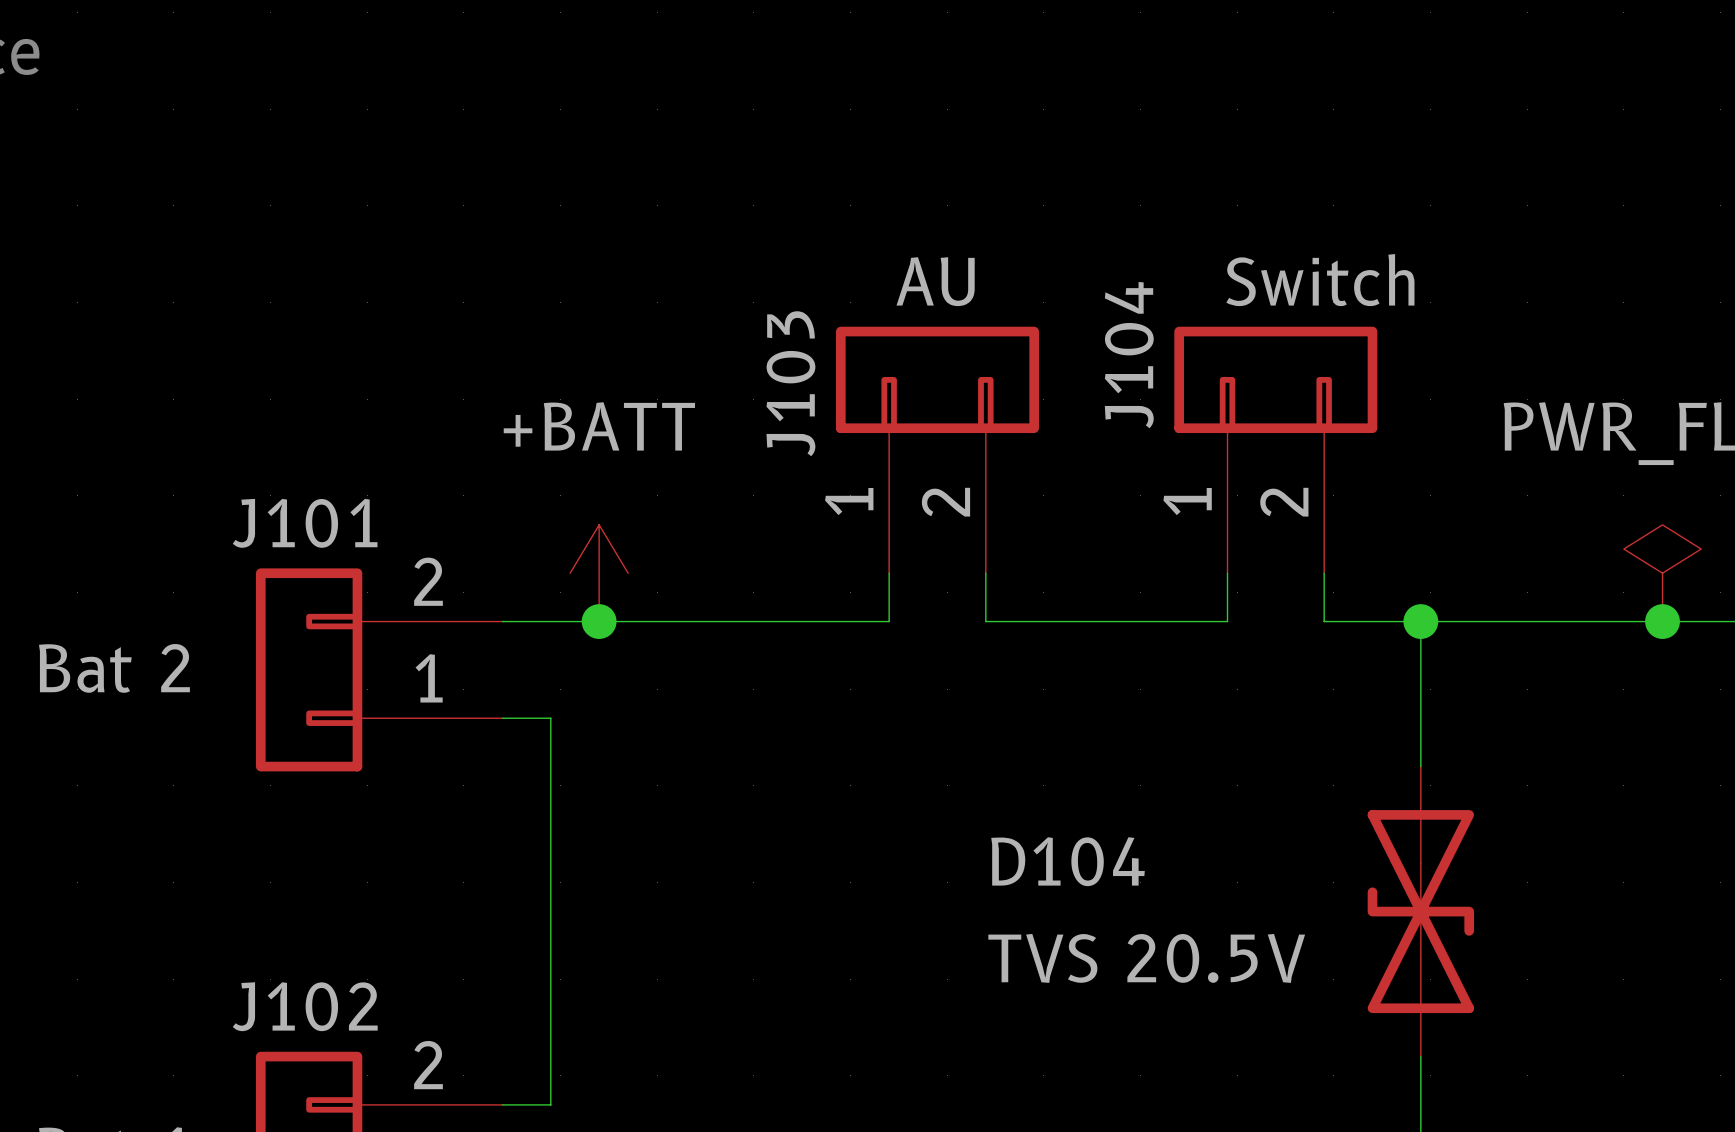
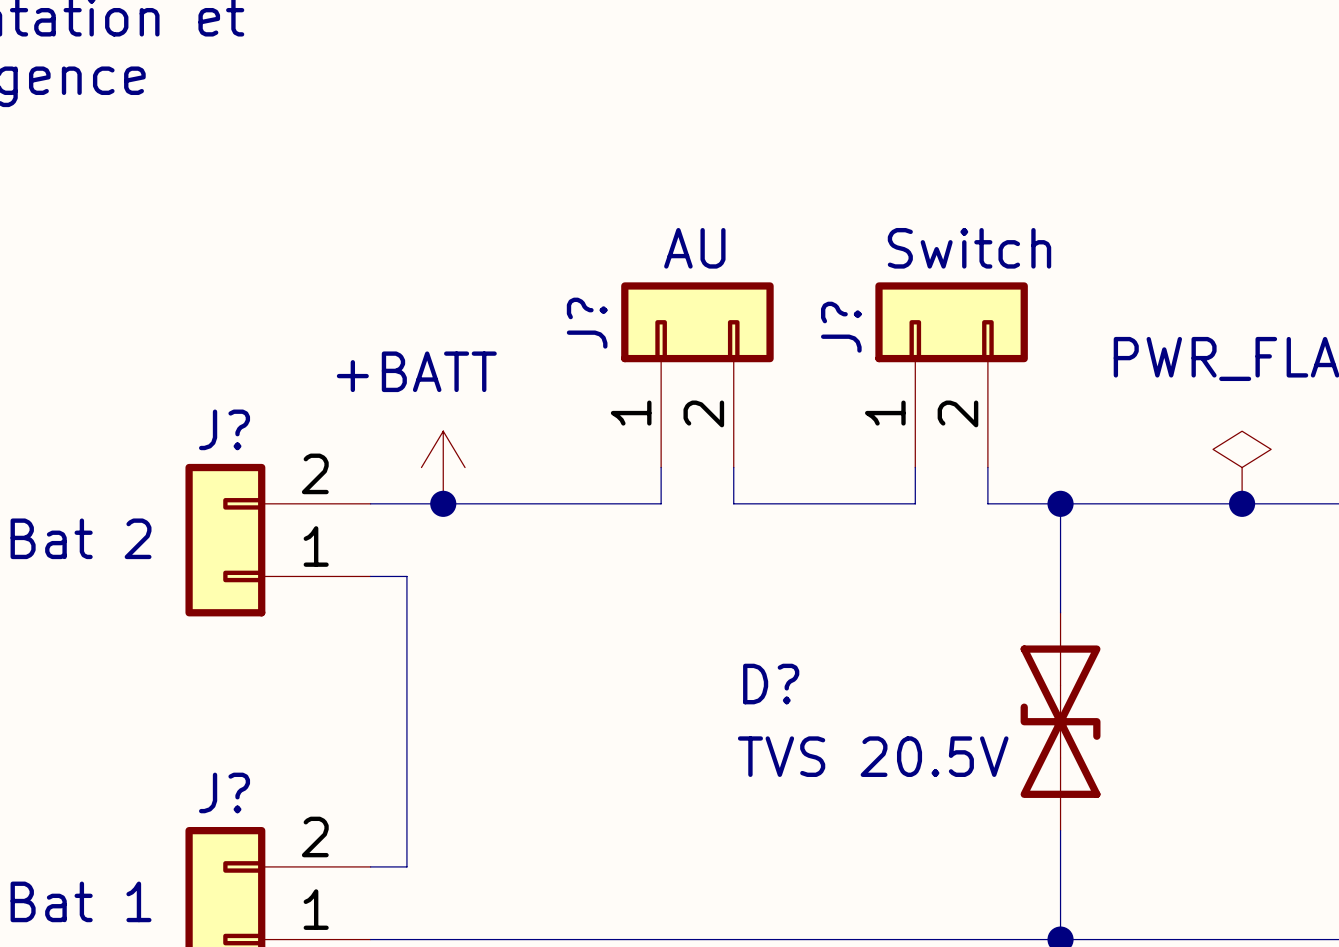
J104 name: J104 (1129, 355) -> J? (841, 327)
J103 name: J103 (790, 383) -> J? (587, 323)
power symbol text position: +BATT (599, 426) -> +BATT (416, 371)
J101 name: J101 (305, 523) -> J? (224, 429)
D104 name: D104 (1068, 861) -> D? (771, 684)
J102 name: J102 (305, 1006) -> J? (224, 792)

